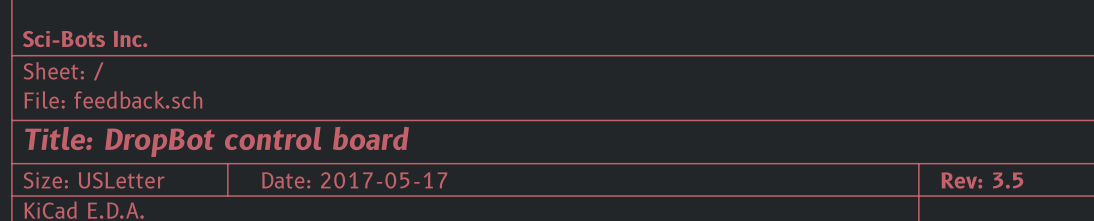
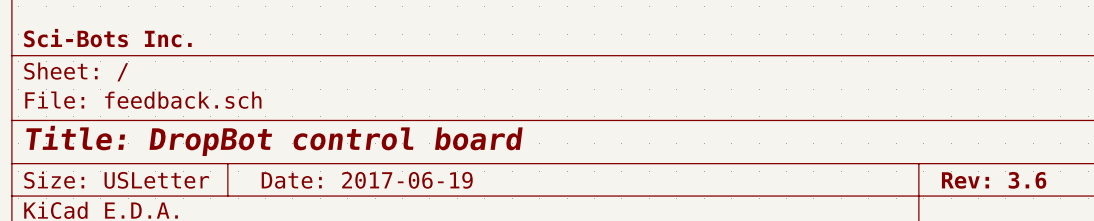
title block: Date: 2017-05-17 (354, 180) -> Date: 2017-06-19 (367, 180)
title block: Rev: 3.5 (982, 180) -> Rev: 3.6 (994, 180)

